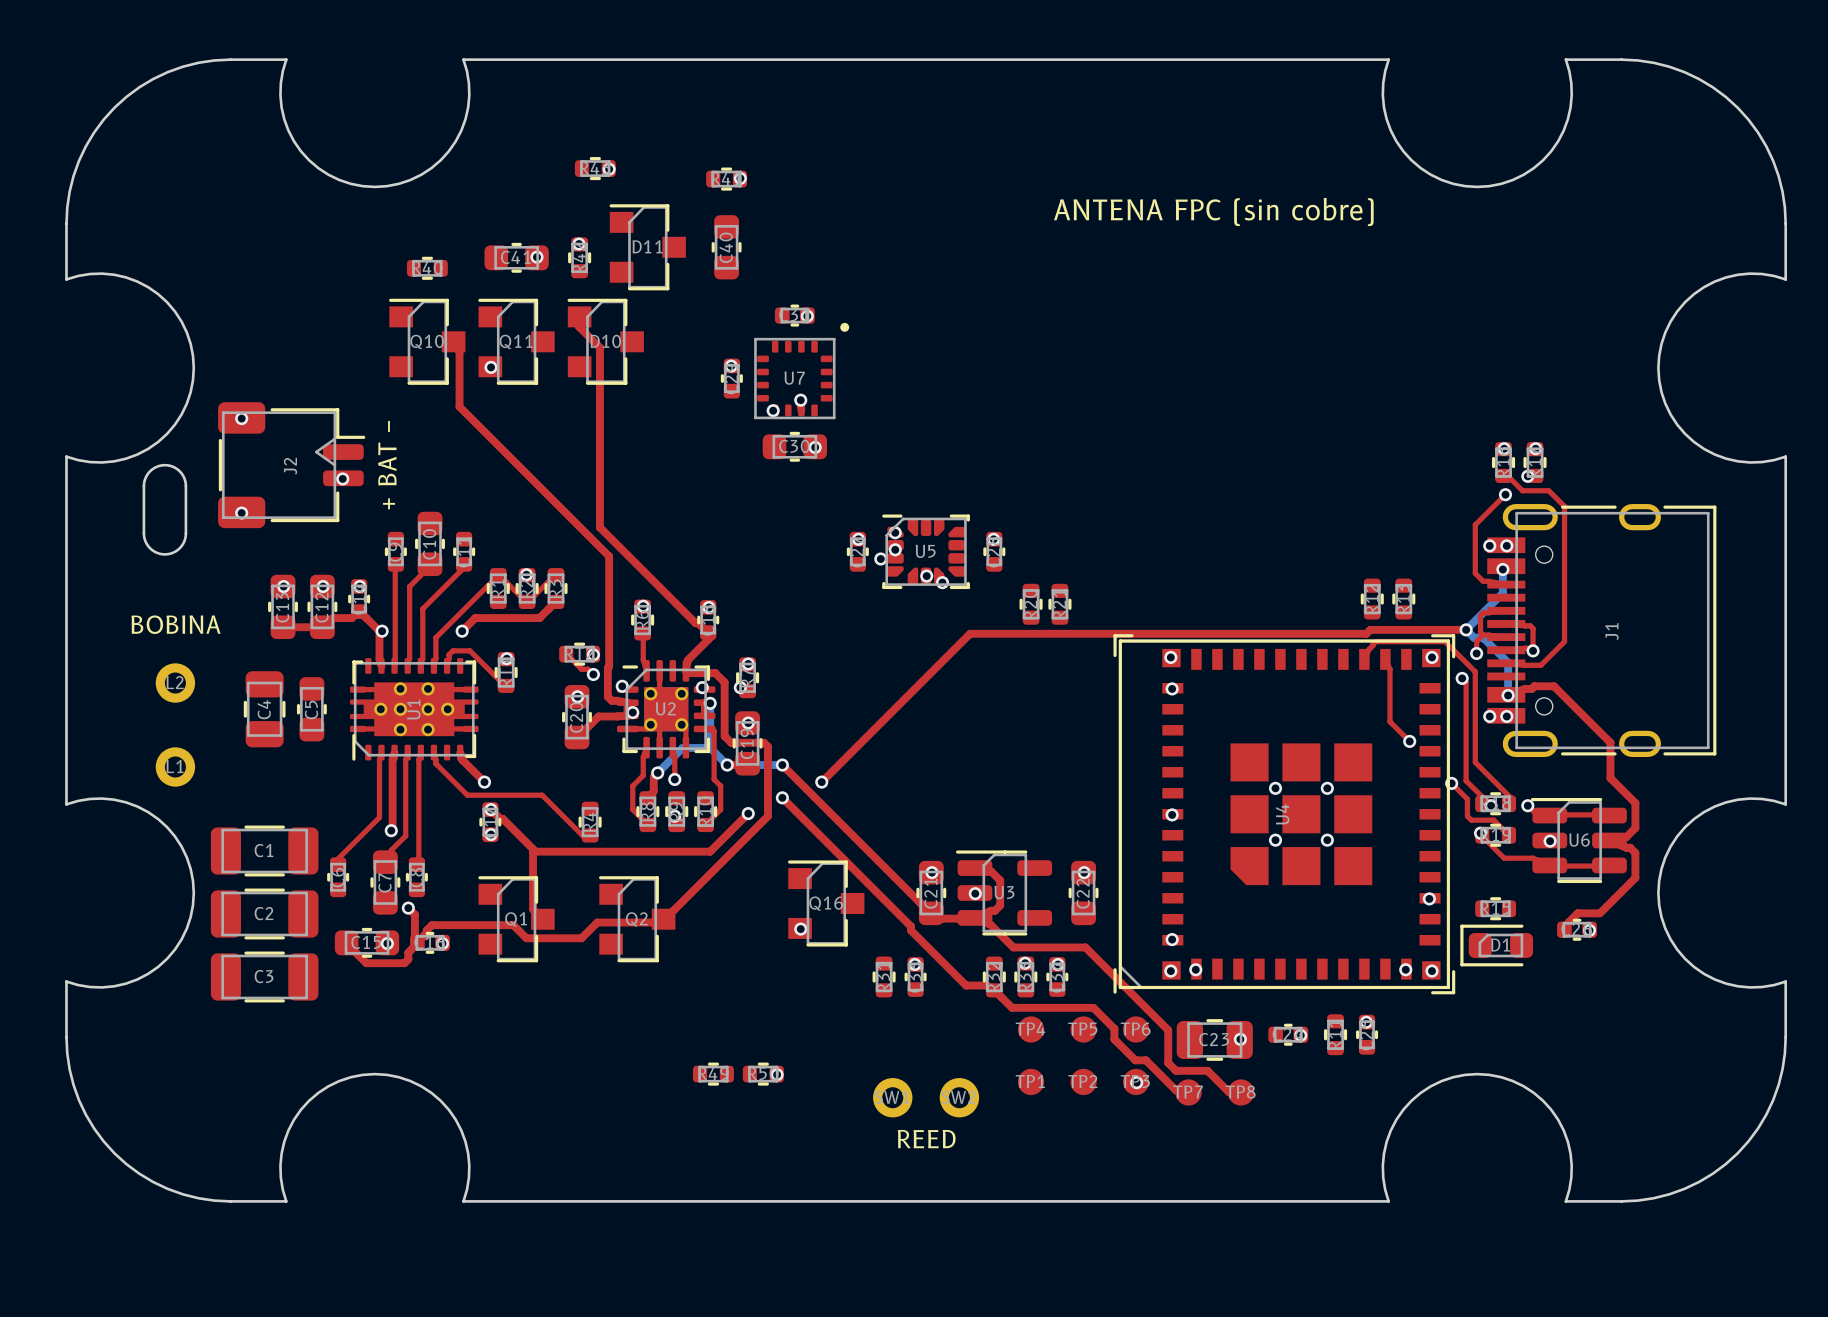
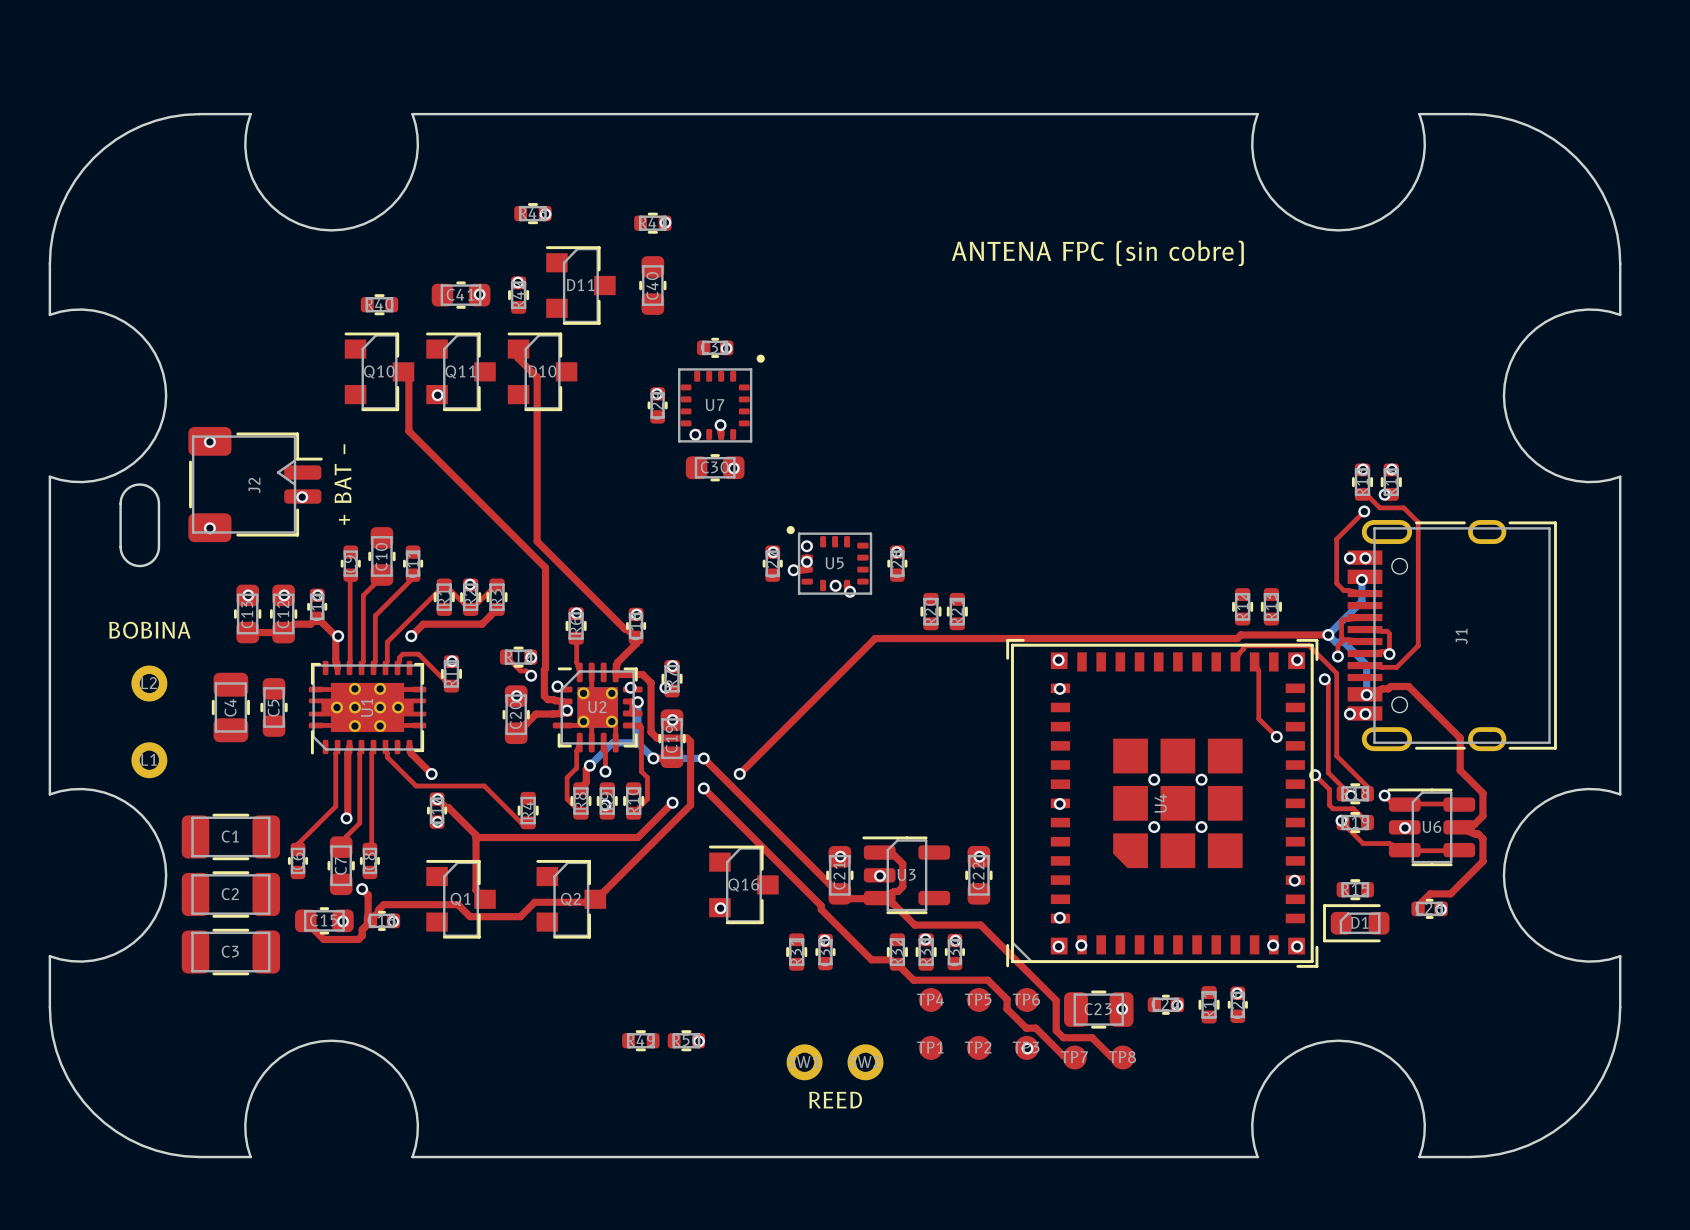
U5 footprint: [882, 514, 970, 590] -> [786, 526, 873, 595]

